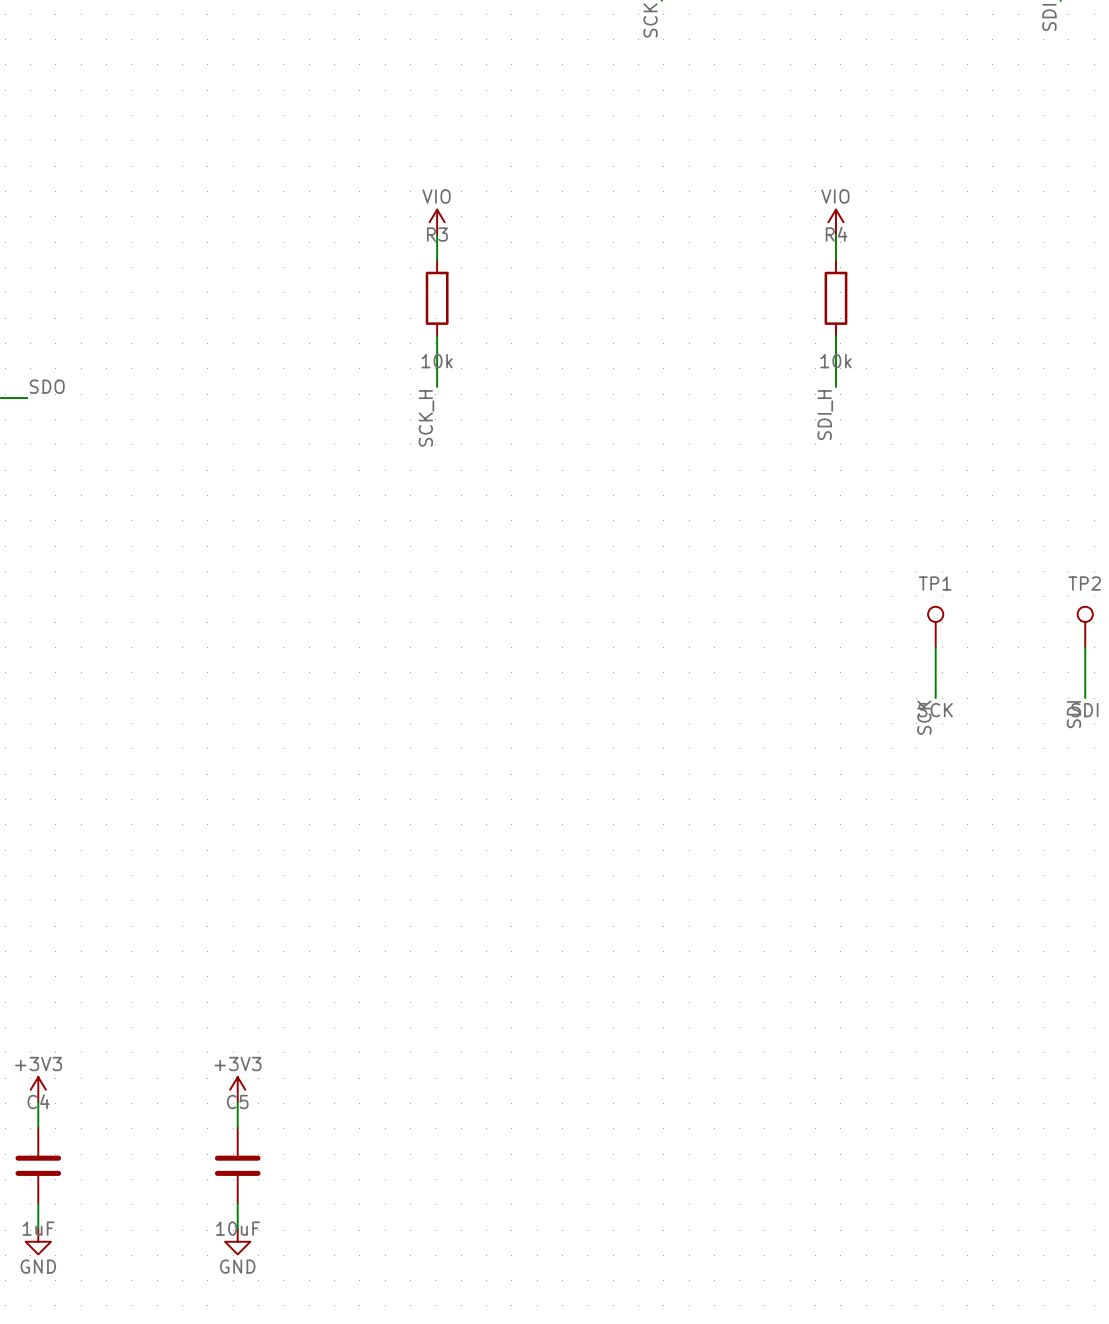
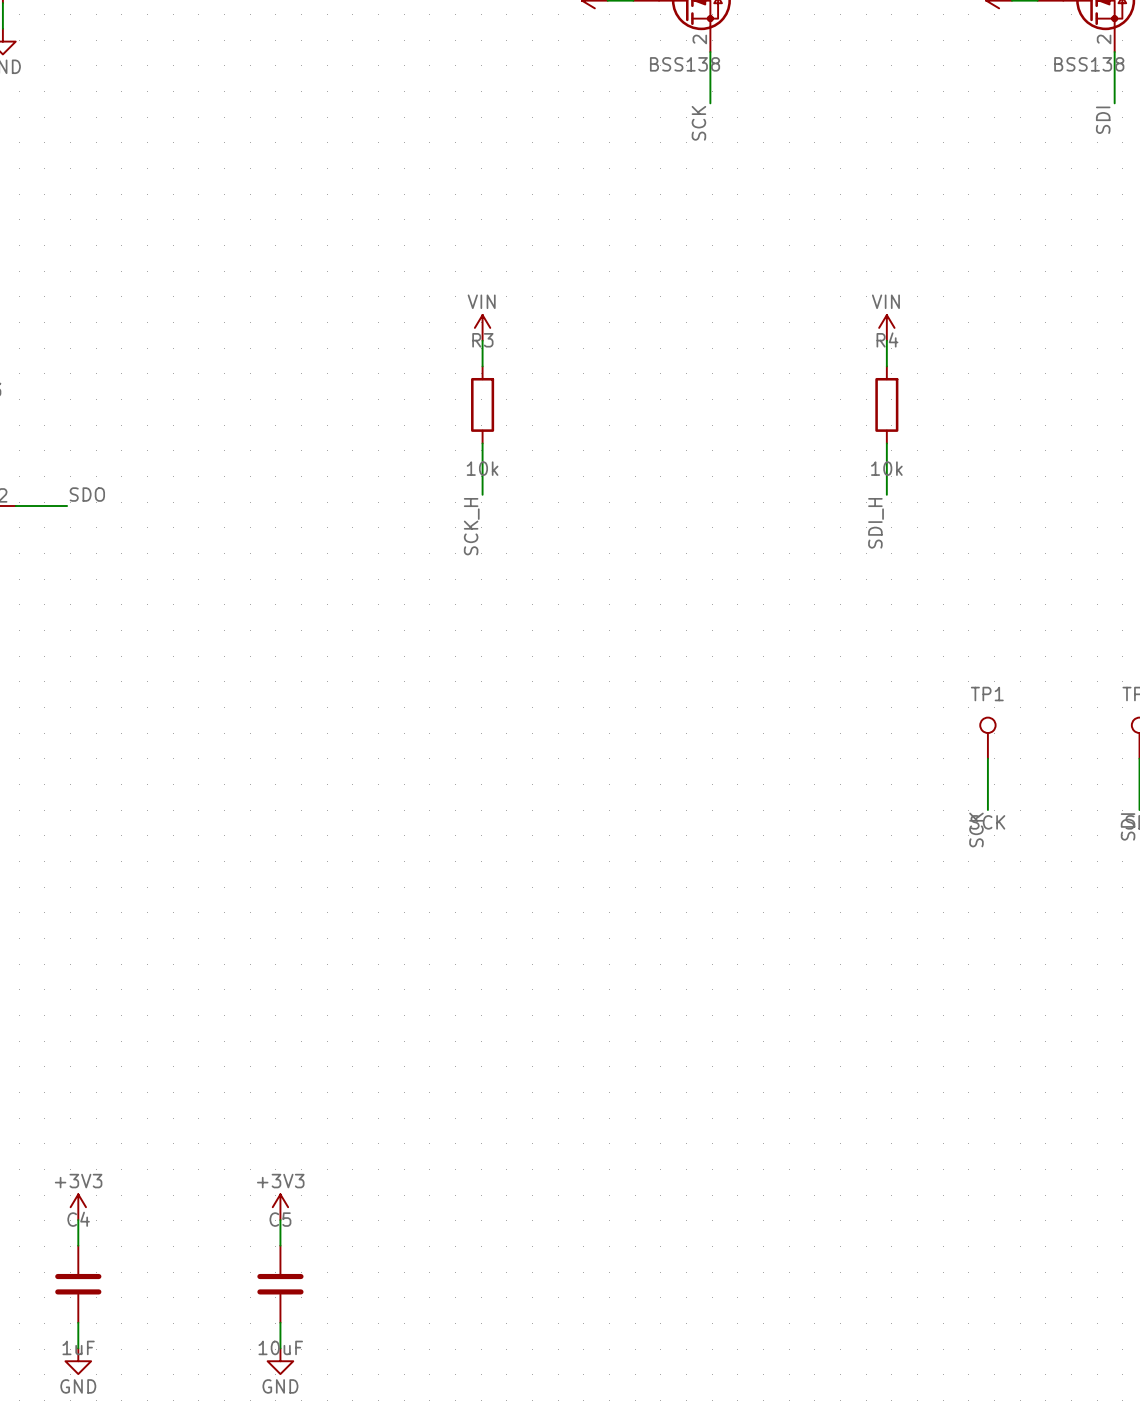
power symbol: VIO (437, 222) -> VIN (482, 327)
power symbol: VIO (835, 222) -> VIN (886, 327)

